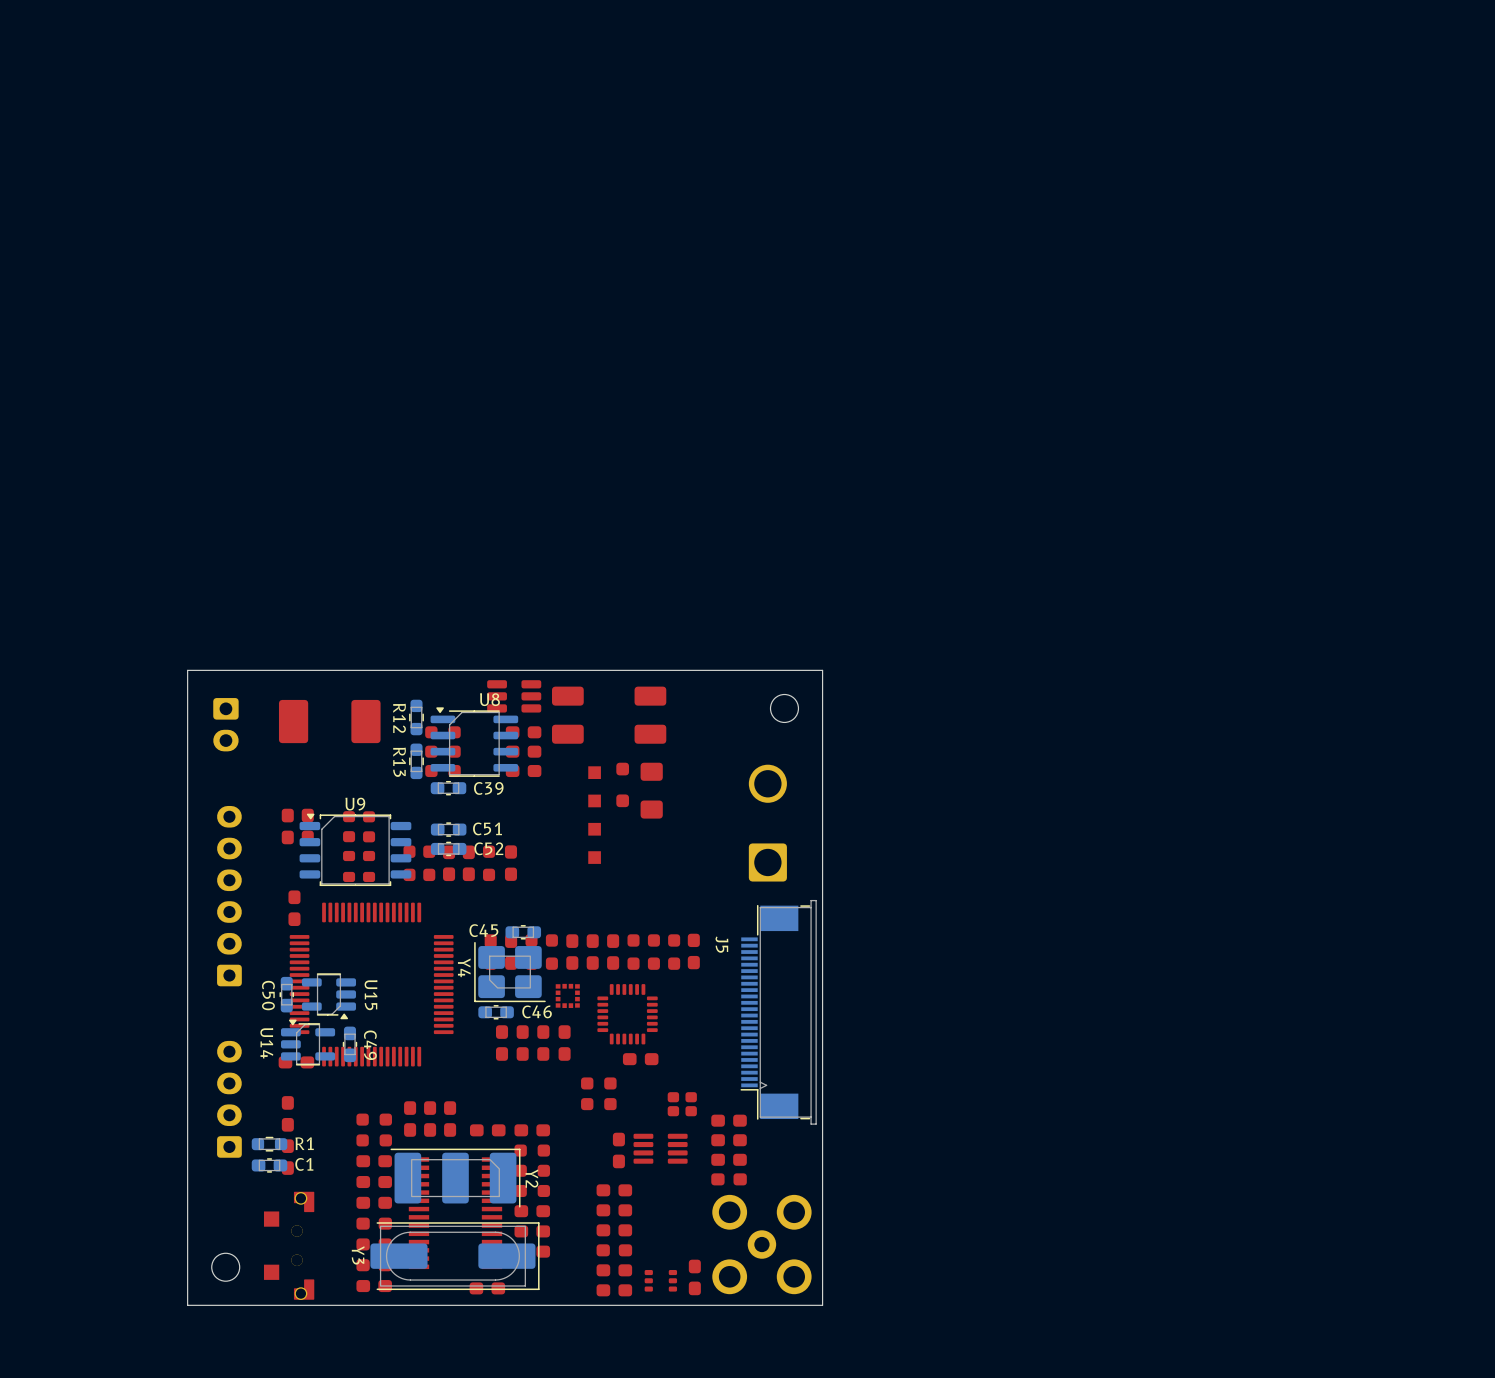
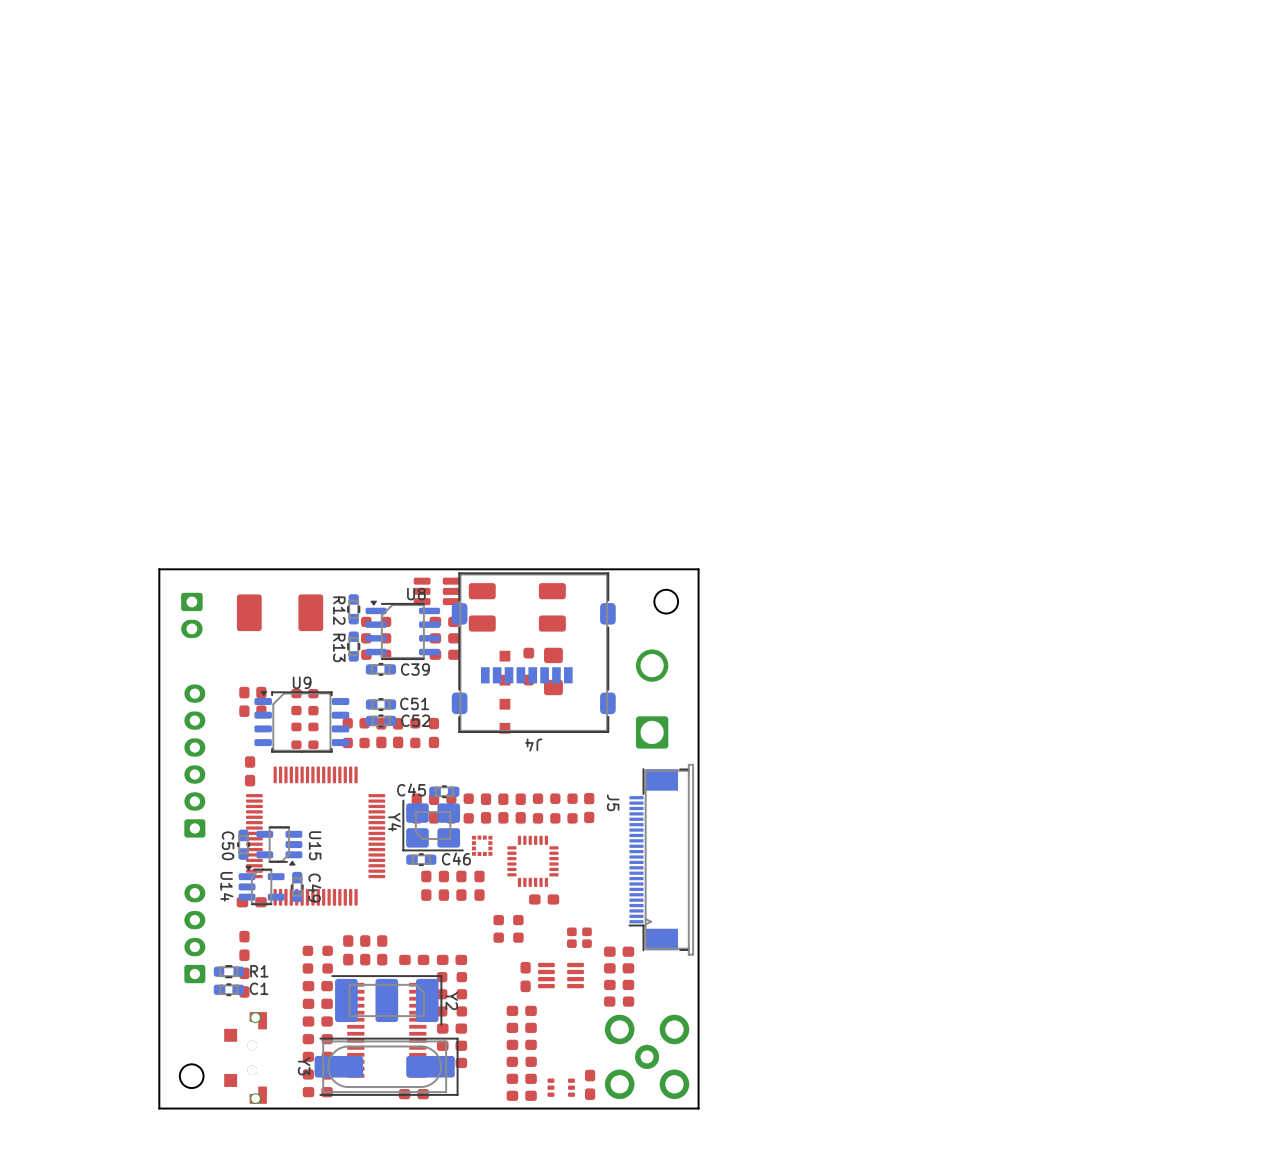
J4: none -> (533, 652)

